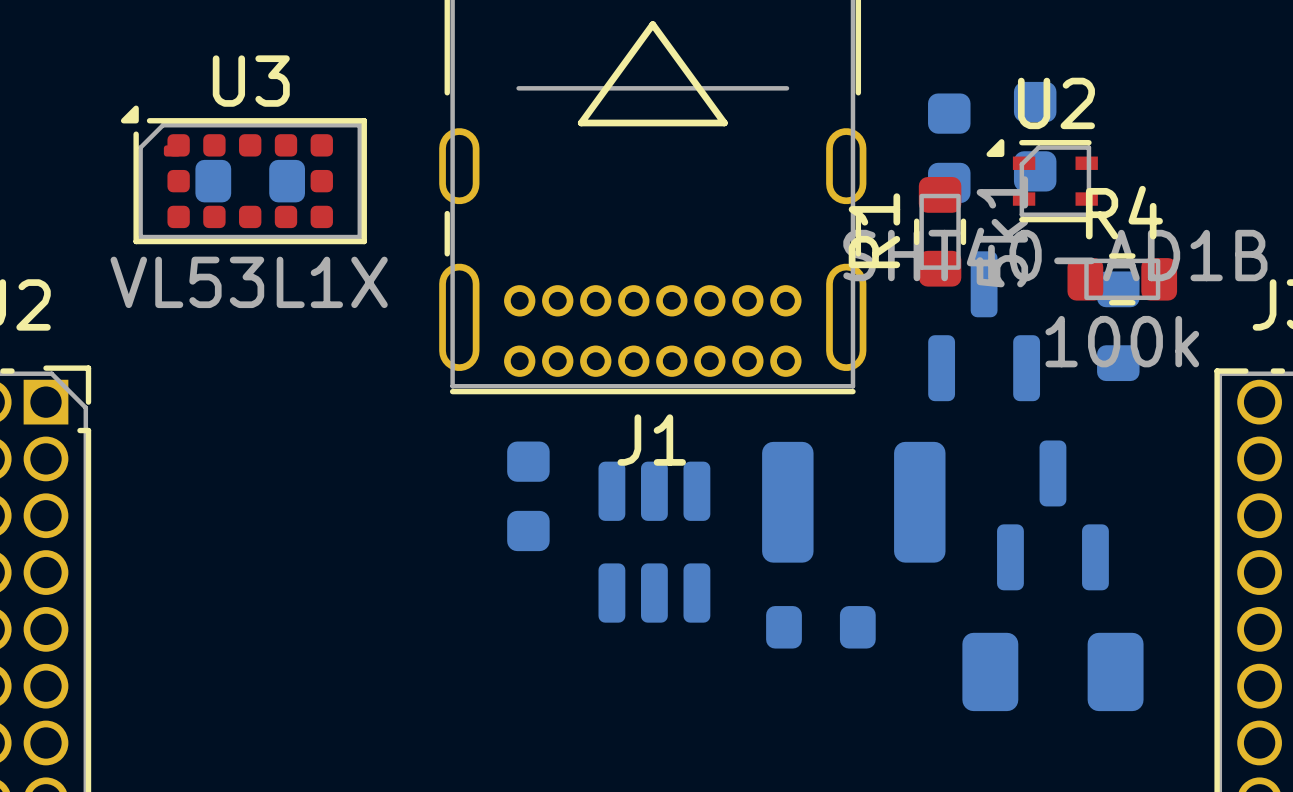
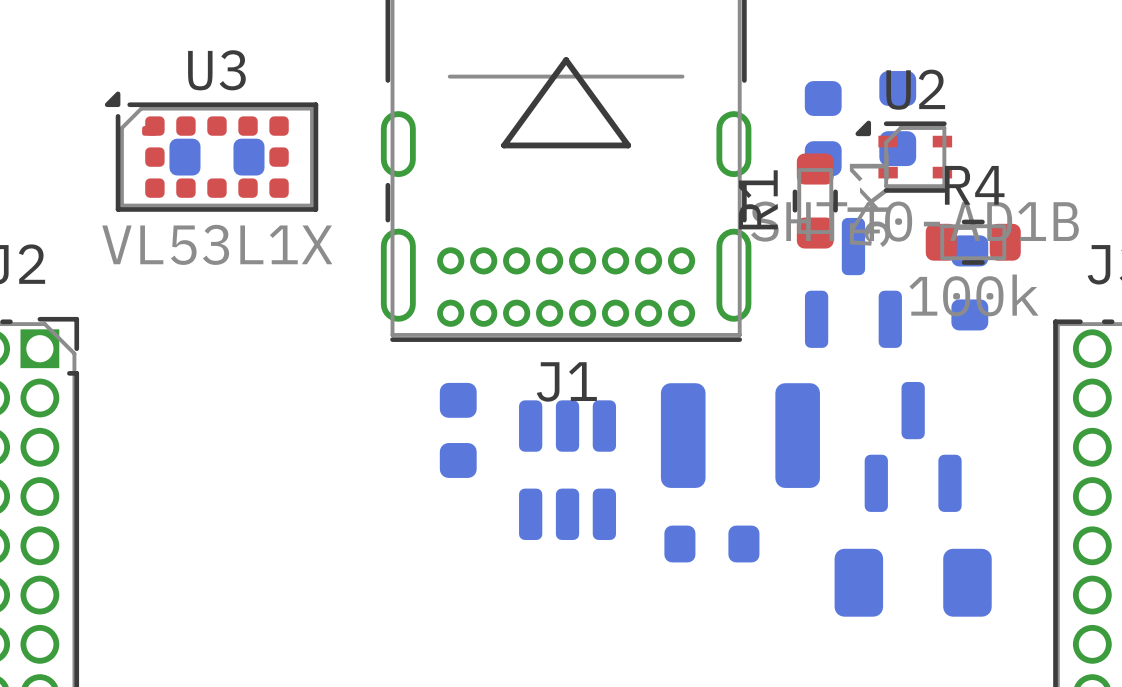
line: (652, 24) (581, 122) (724, 122) (652, 24) -> (566, 60) (504, 145) (628, 145) (566, 60)

